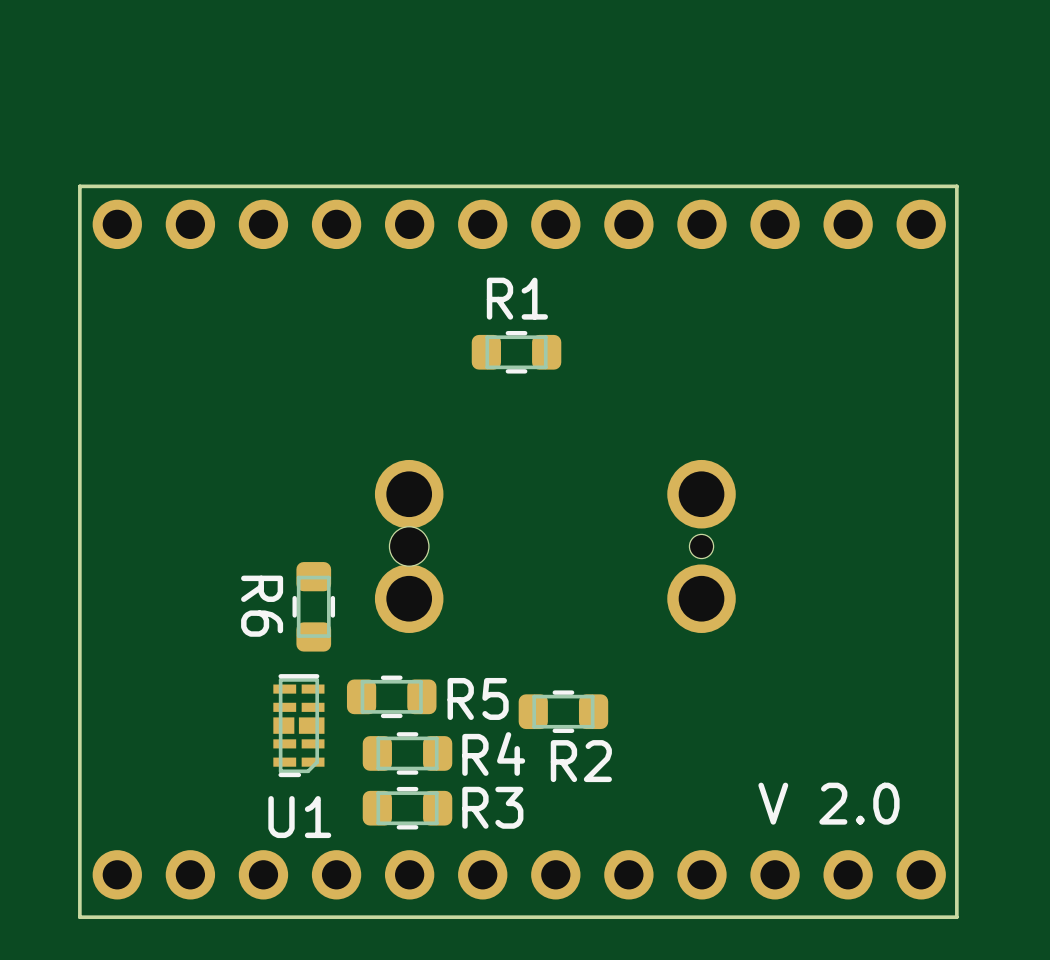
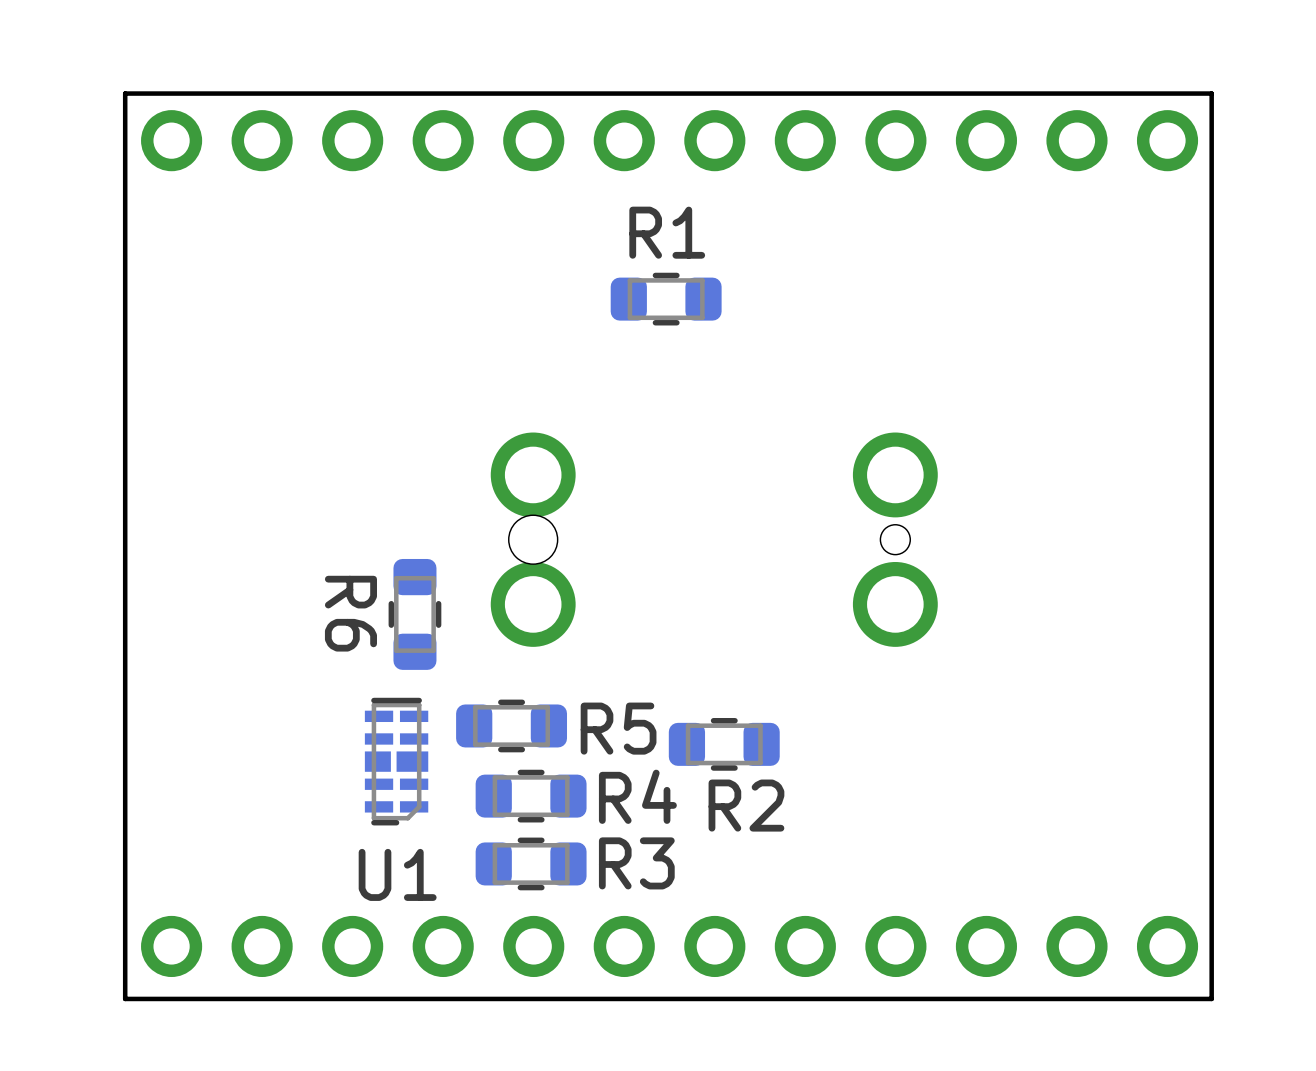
text: V 2.0 (828, 803) -> none

